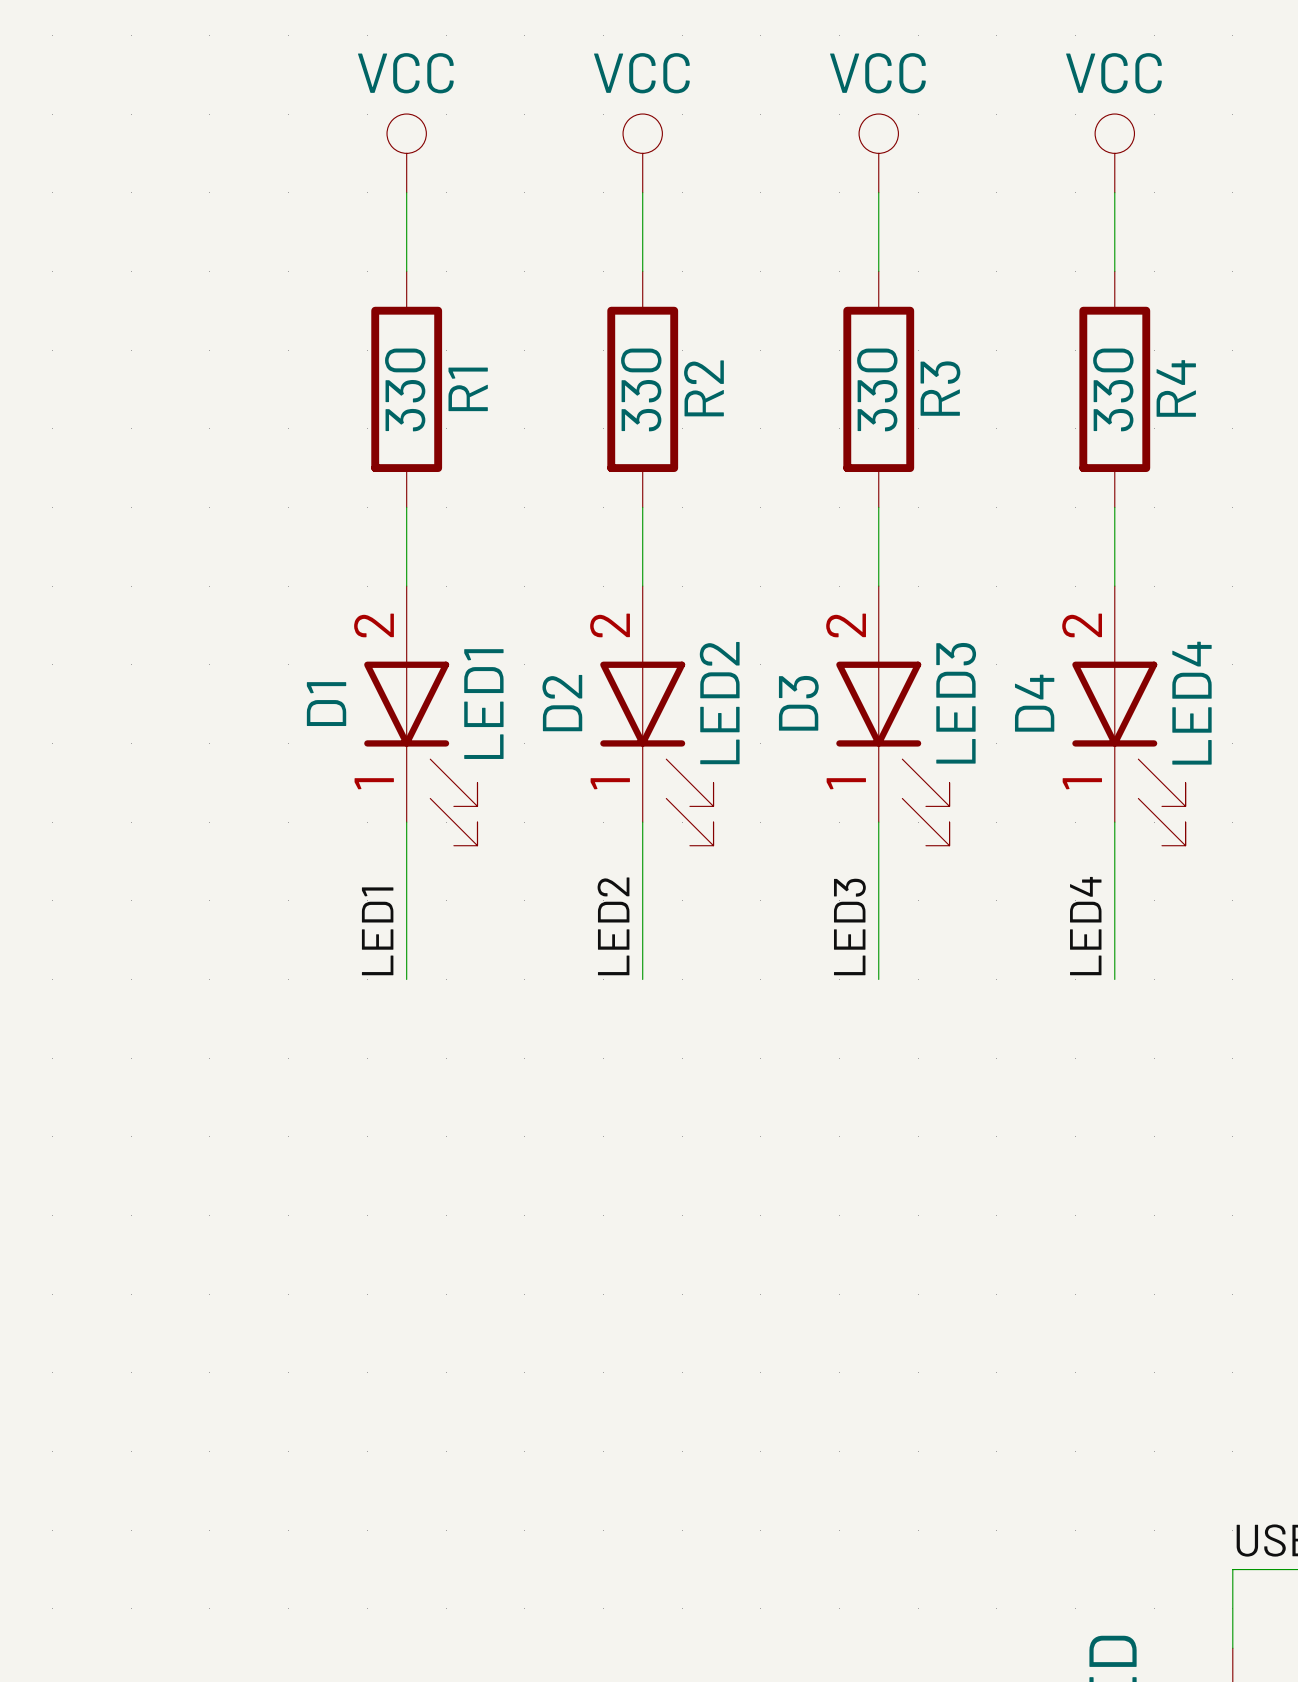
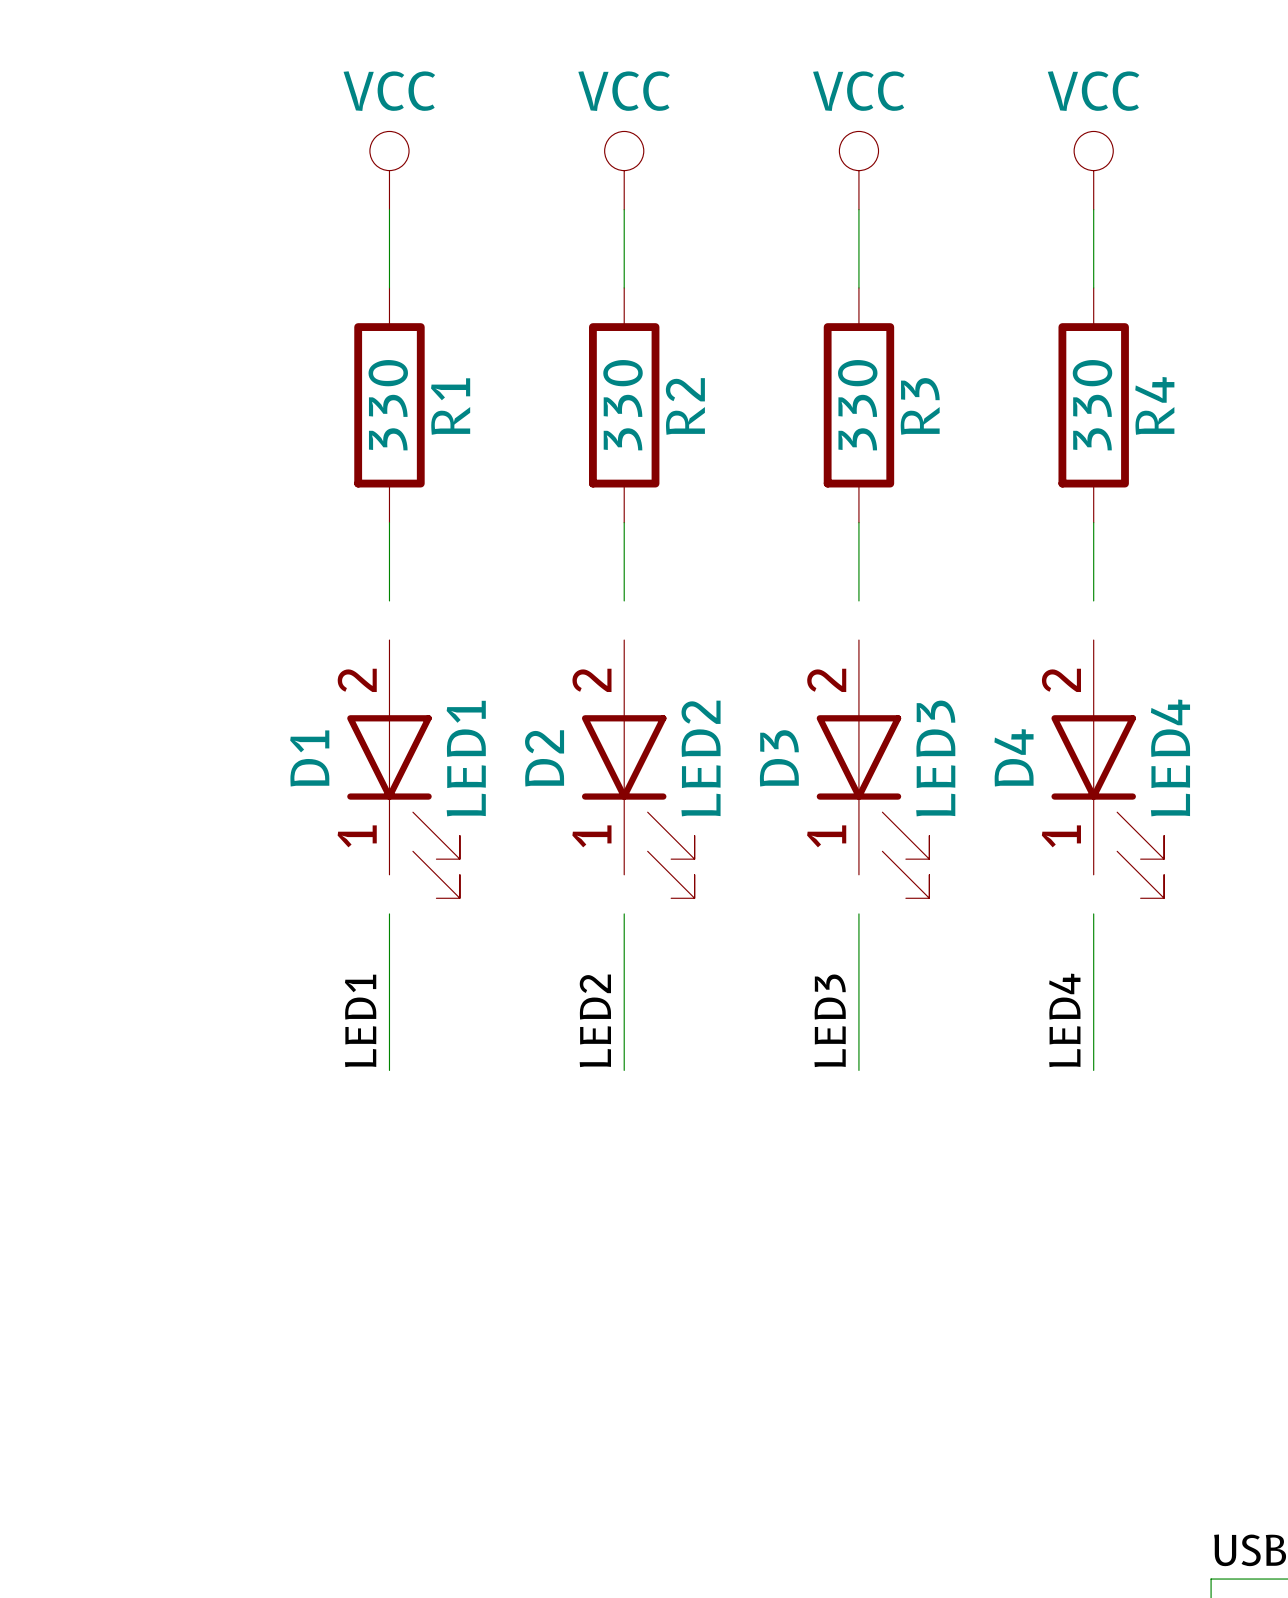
D1 position: (420, 715) -> (403, 769)
D2 position: (656, 715) -> (638, 769)
D3 position: (892, 715) -> (873, 769)
D4 position: (1128, 715) -> (1107, 769)
wire: (406, 822) (406, 900) -> (389, 992) (389, 1070)
wire: (642, 822) (642, 900) -> (624, 992) (624, 1070)
wire: (878, 822) (878, 900) -> (858, 992) (858, 1070)
wire: (1114, 822) (1114, 900) -> (1093, 992) (1093, 1070)
label position: LED2 (613, 926) -> LED2 (595, 1020)
label position: LED3 (849, 926) -> LED3 (830, 1020)
label position: LED4 (1085, 926) -> LED4 (1064, 1020)
label position: LED1 (377, 931) -> LED1 (360, 1020)

